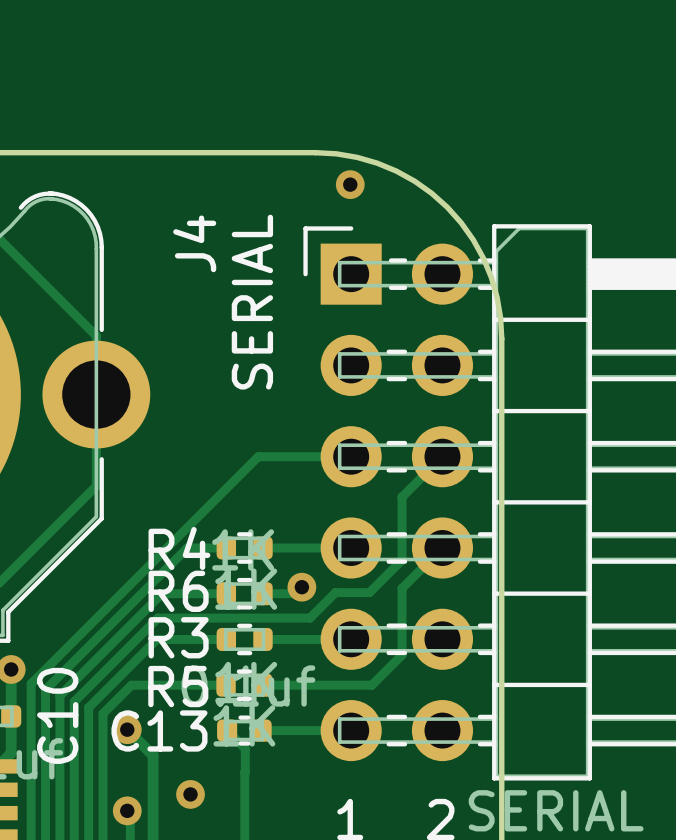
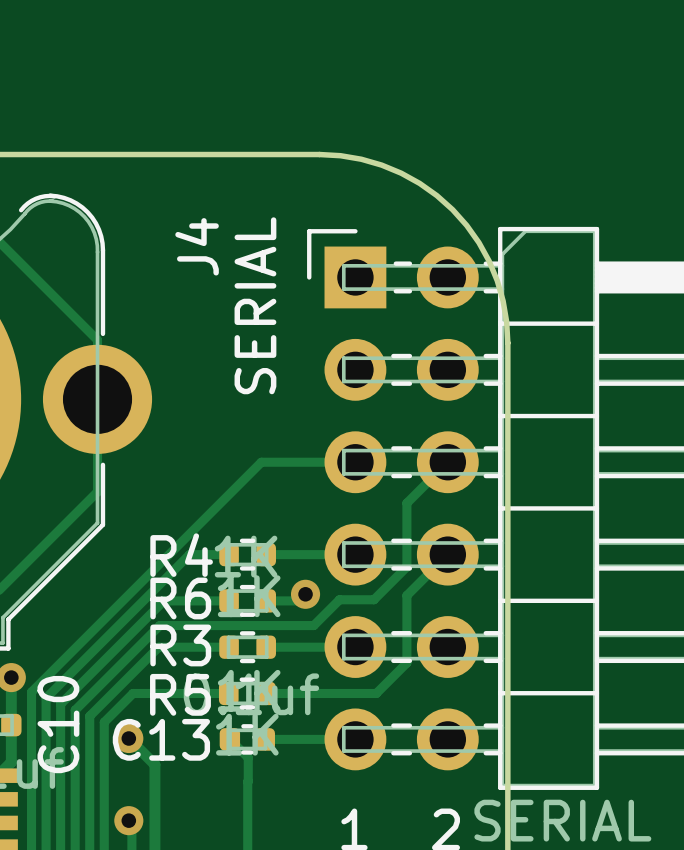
via: (350, 184) -> none
via: (190, 794) -> none

